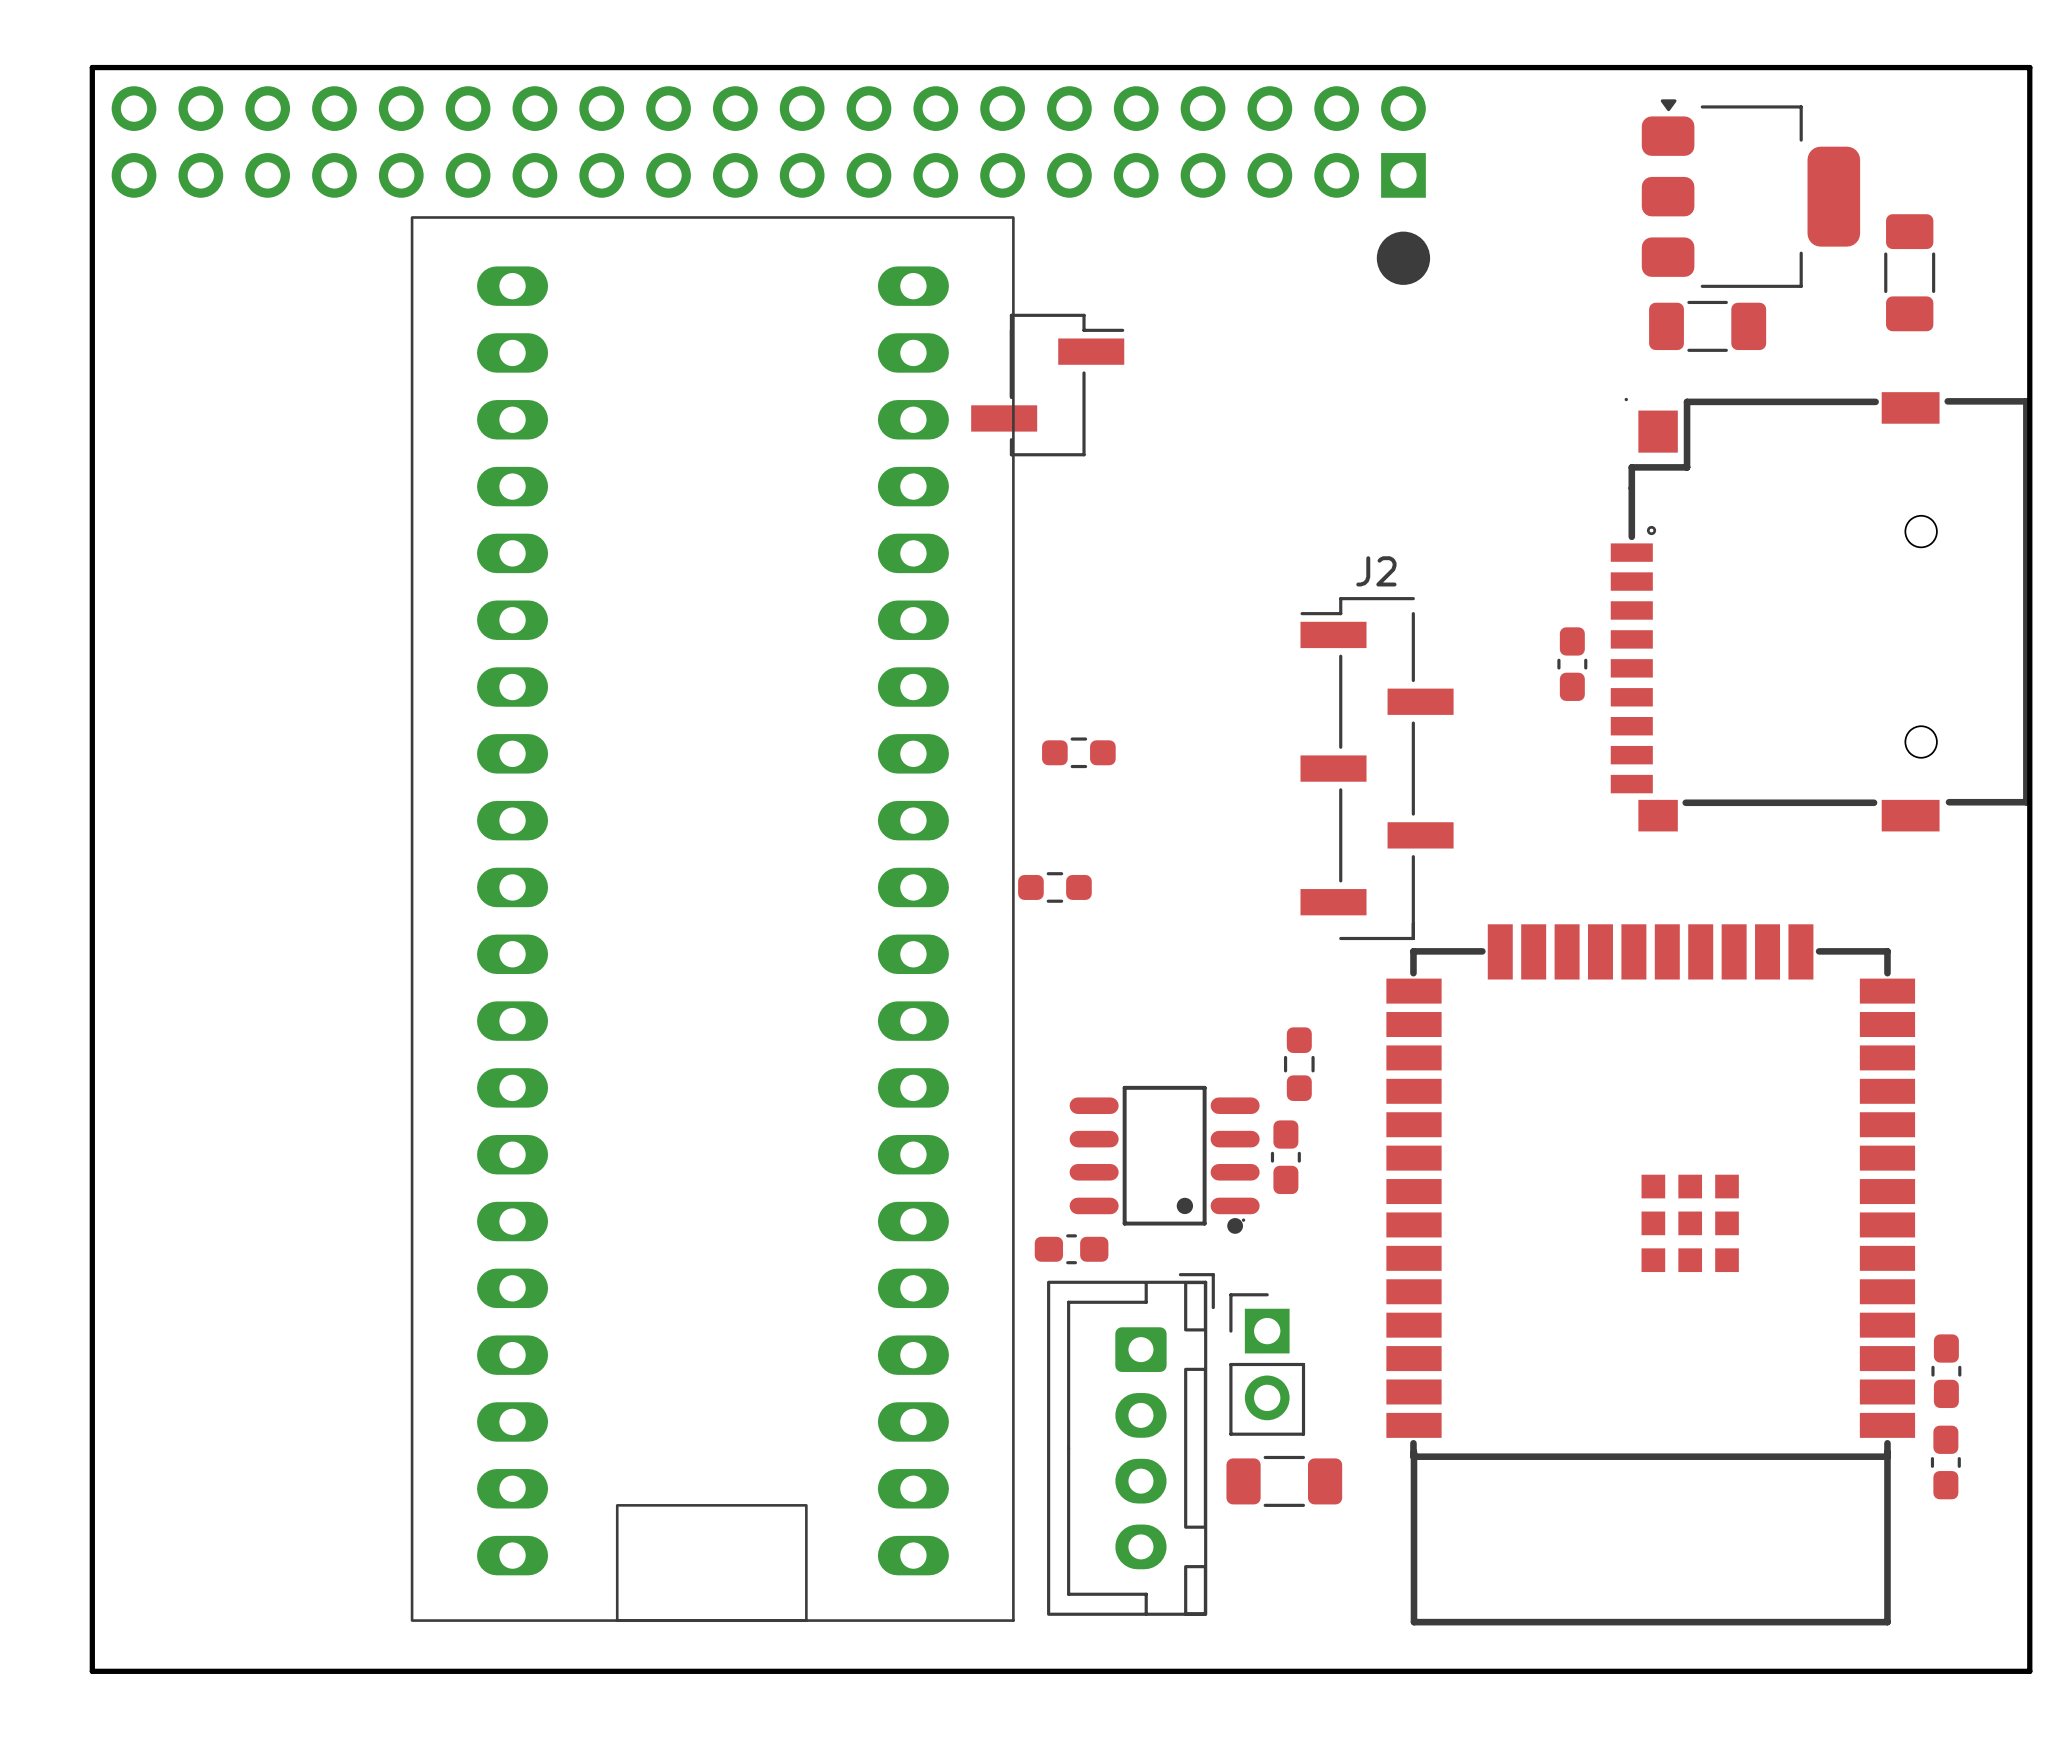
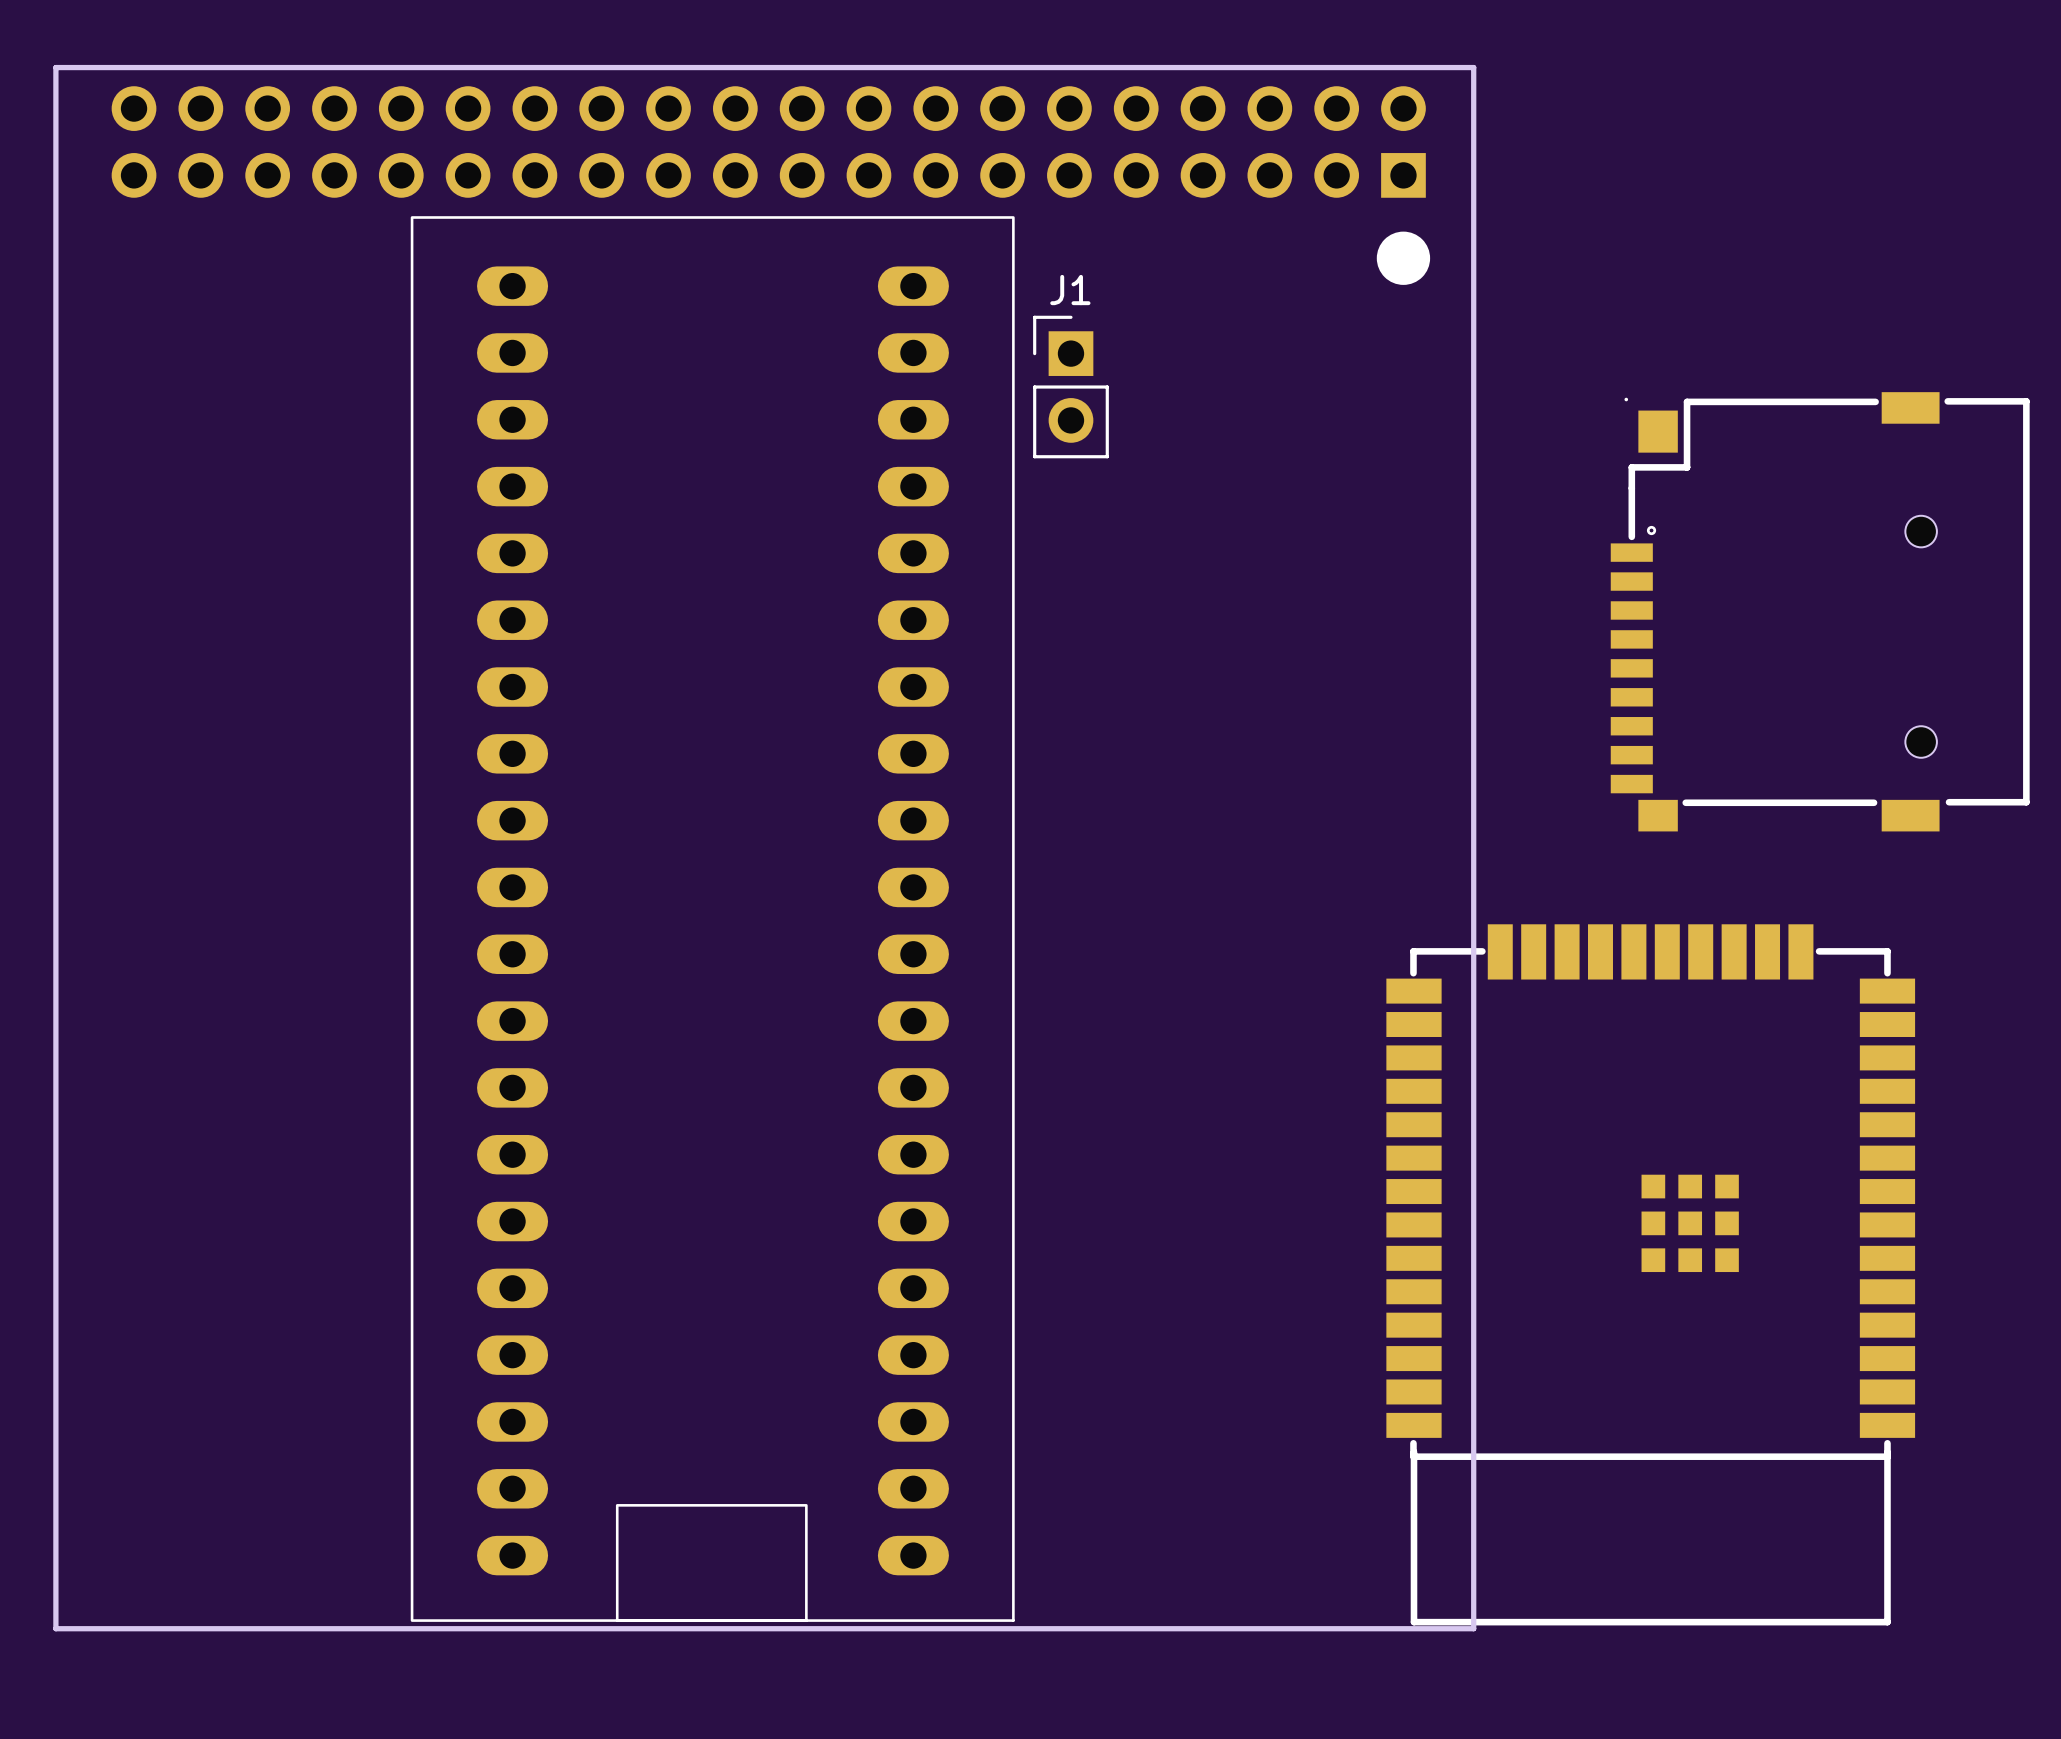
board edge: (92, 67) (92, 1671) (2029, 1671) (2029, 67) (1473, 67) -> (92, 67) (55, 67) (55, 1628) (1473, 1628) (1473, 67)
part: (1750, 193) -> none
part: (1909, 272) -> none
part: (1707, 326) -> none
part: (1047, 385) -> none
J1: none -> (1070, 387)
part: (1572, 664) -> none
part: (1078, 752) -> none
J2: (1377, 768) -> none
part: (1054, 887) -> none
part: (1299, 1064) -> none
part: (1285, 1157) -> none
part: (1164, 1159) -> none
part: (1071, 1249) -> none
part: (1267, 1364) -> none
part: (1946, 1371) -> none
part: (1130, 1444) -> none
part: (1945, 1462) -> none
part: (1284, 1481) -> none

